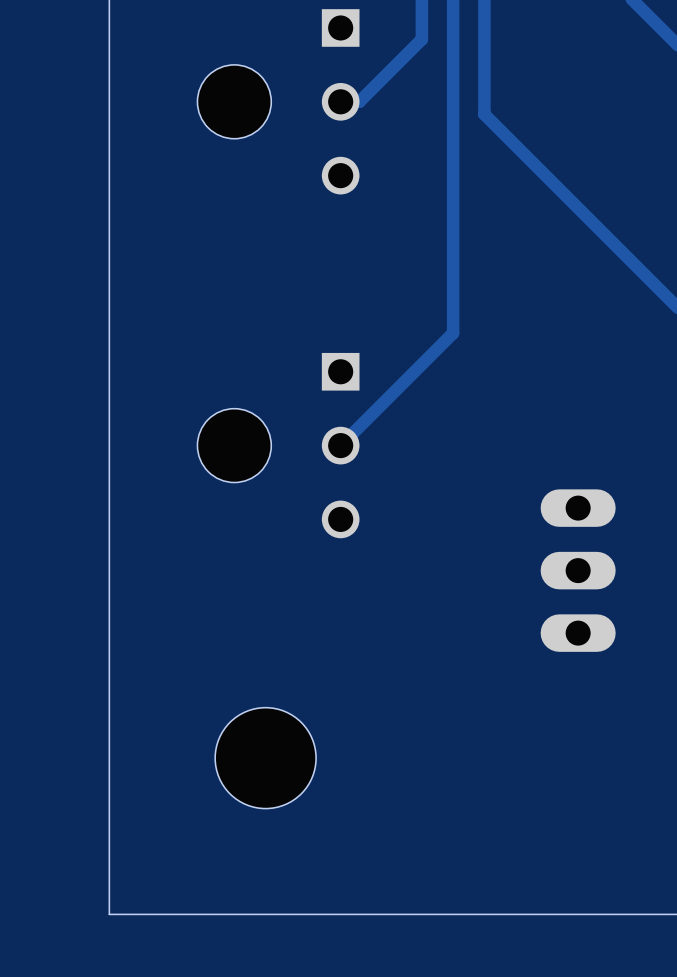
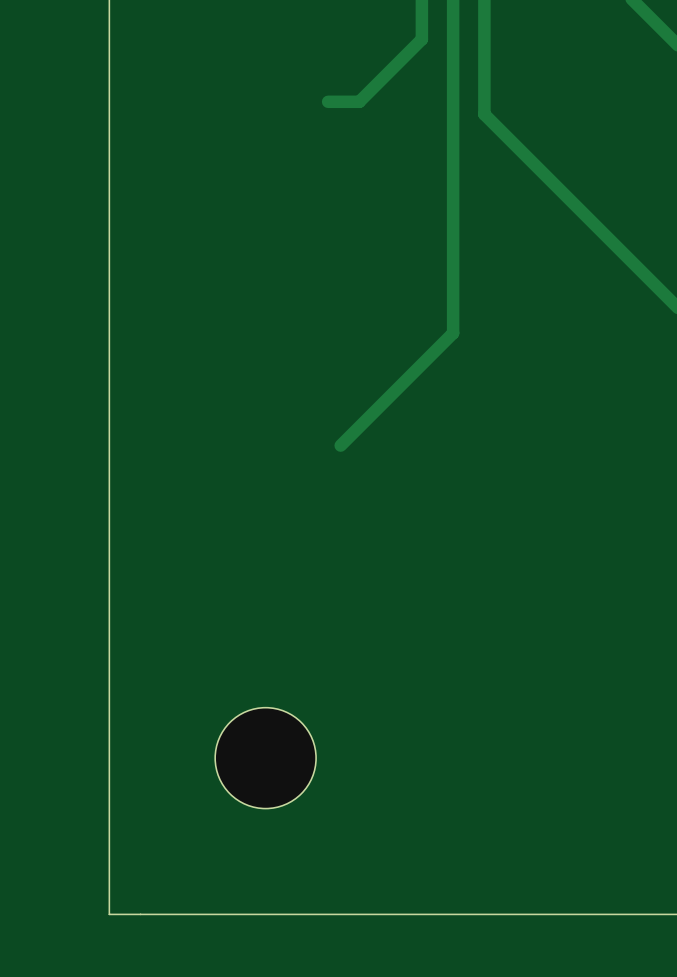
part: (278, 101) -> none
part: (278, 445) -> none
part: (578, 570) -> none

